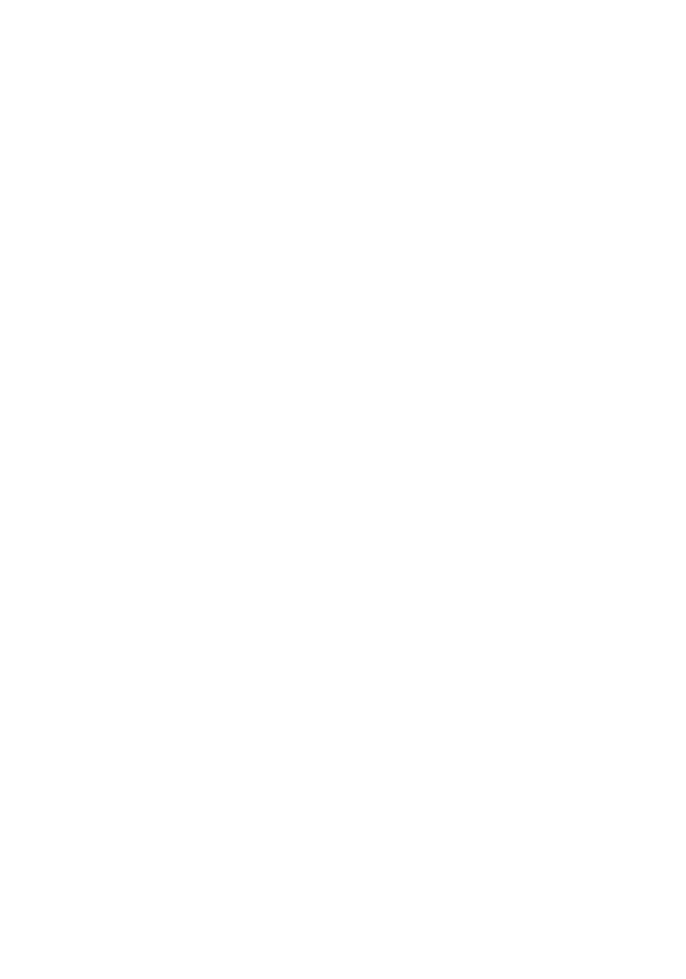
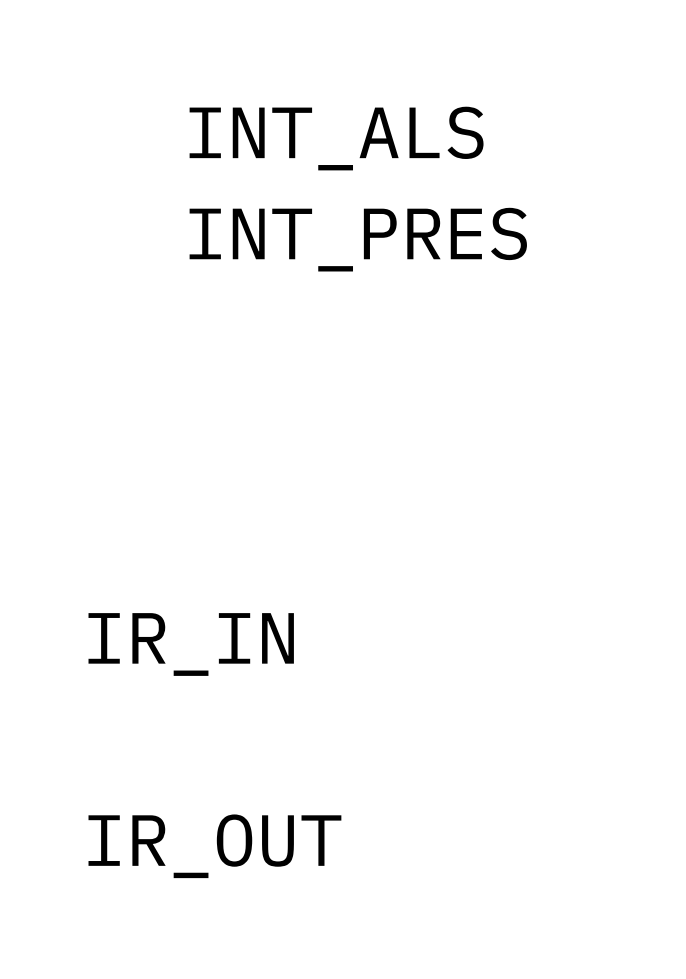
label: none -> INT_ALS (336, 138)
label: none -> INT_PRES (358, 239)
label: none -> IR_IN (191, 644)
label: none -> IR_OUT (214, 846)

